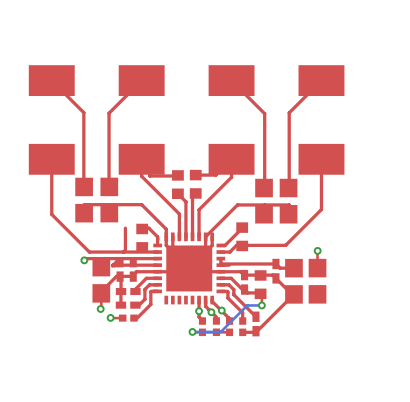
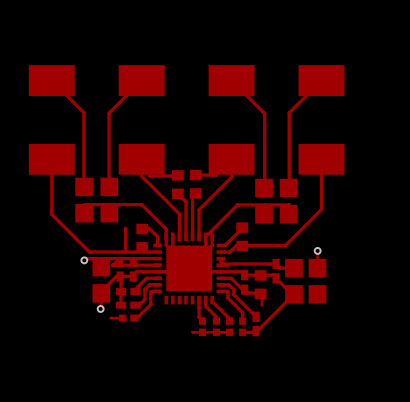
bottom track: (261, 305) (247, 305) (220, 331) (192, 331) -> none
via: (261, 305) -> none
via: (221, 310) -> none
via: (199, 311) -> none
via: (211, 312) -> none
via: (110, 317) -> none
via: (192, 331) -> none

